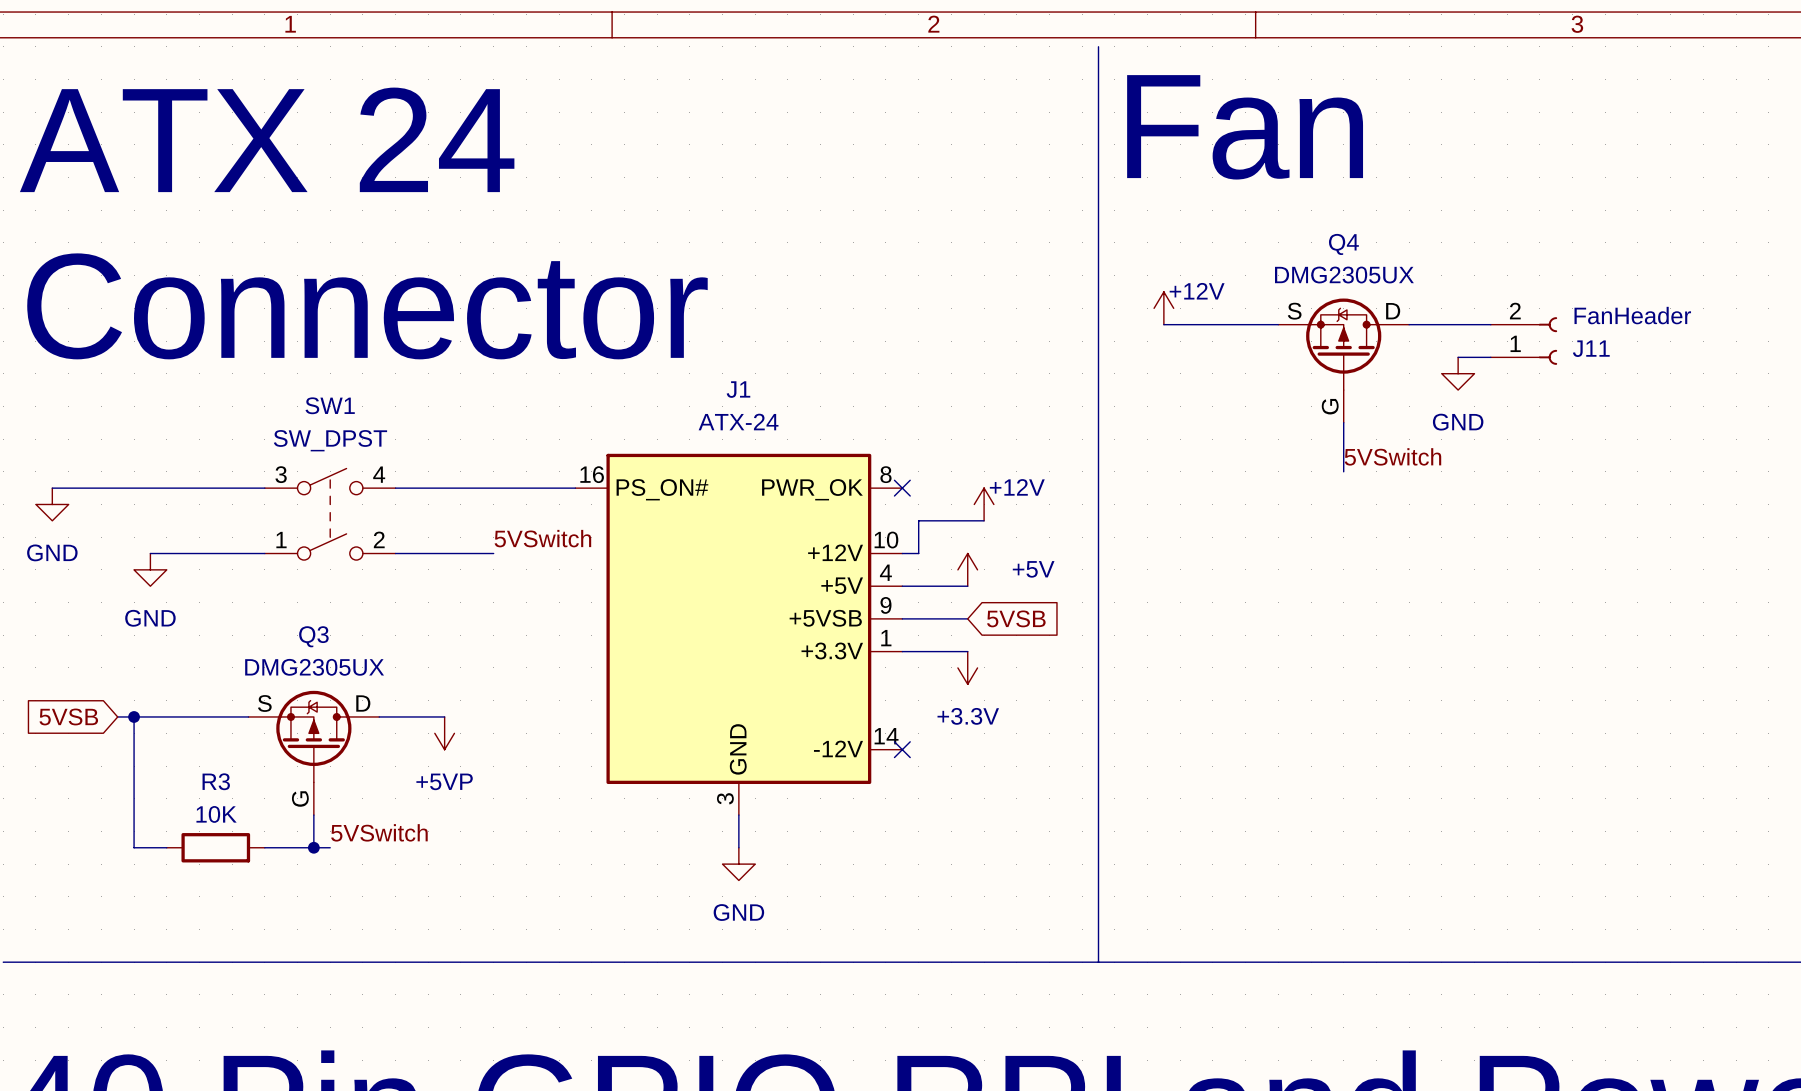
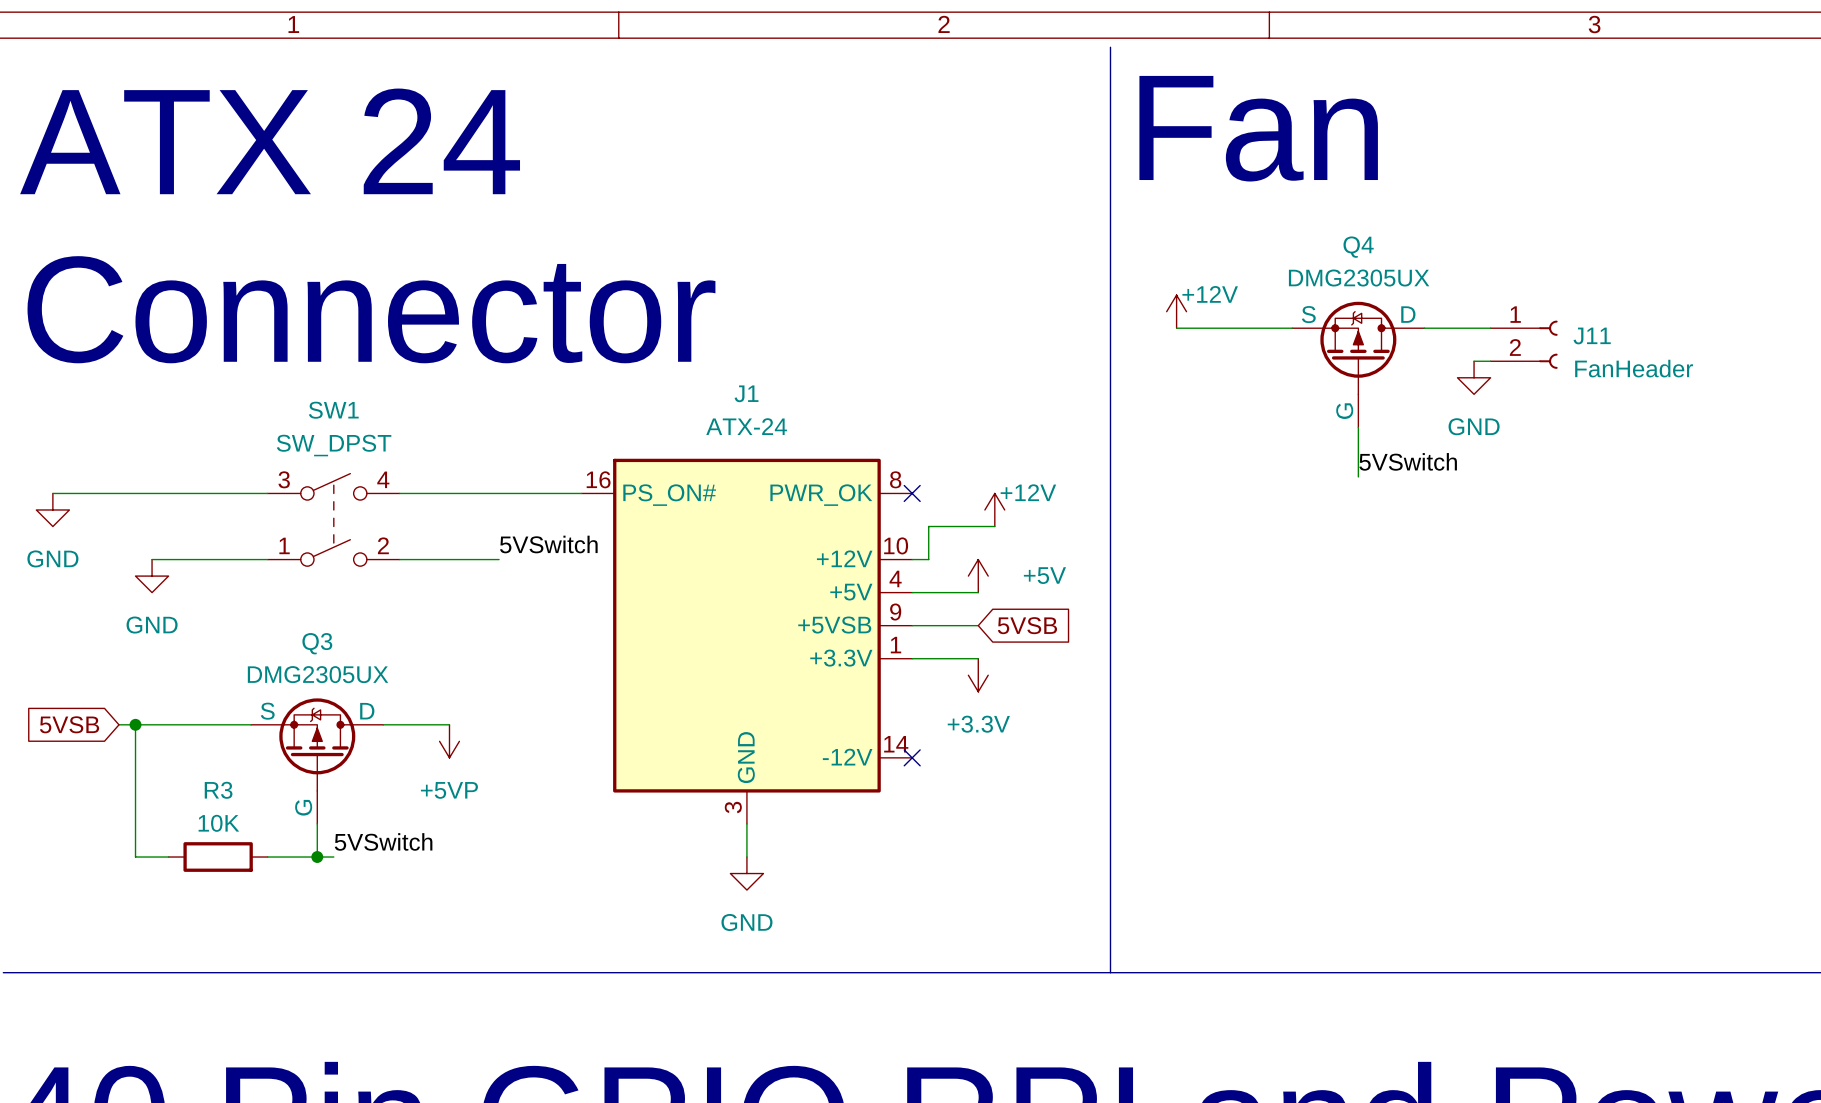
J11 flip: as is (1548, 341) -> up-down (1548, 344)

